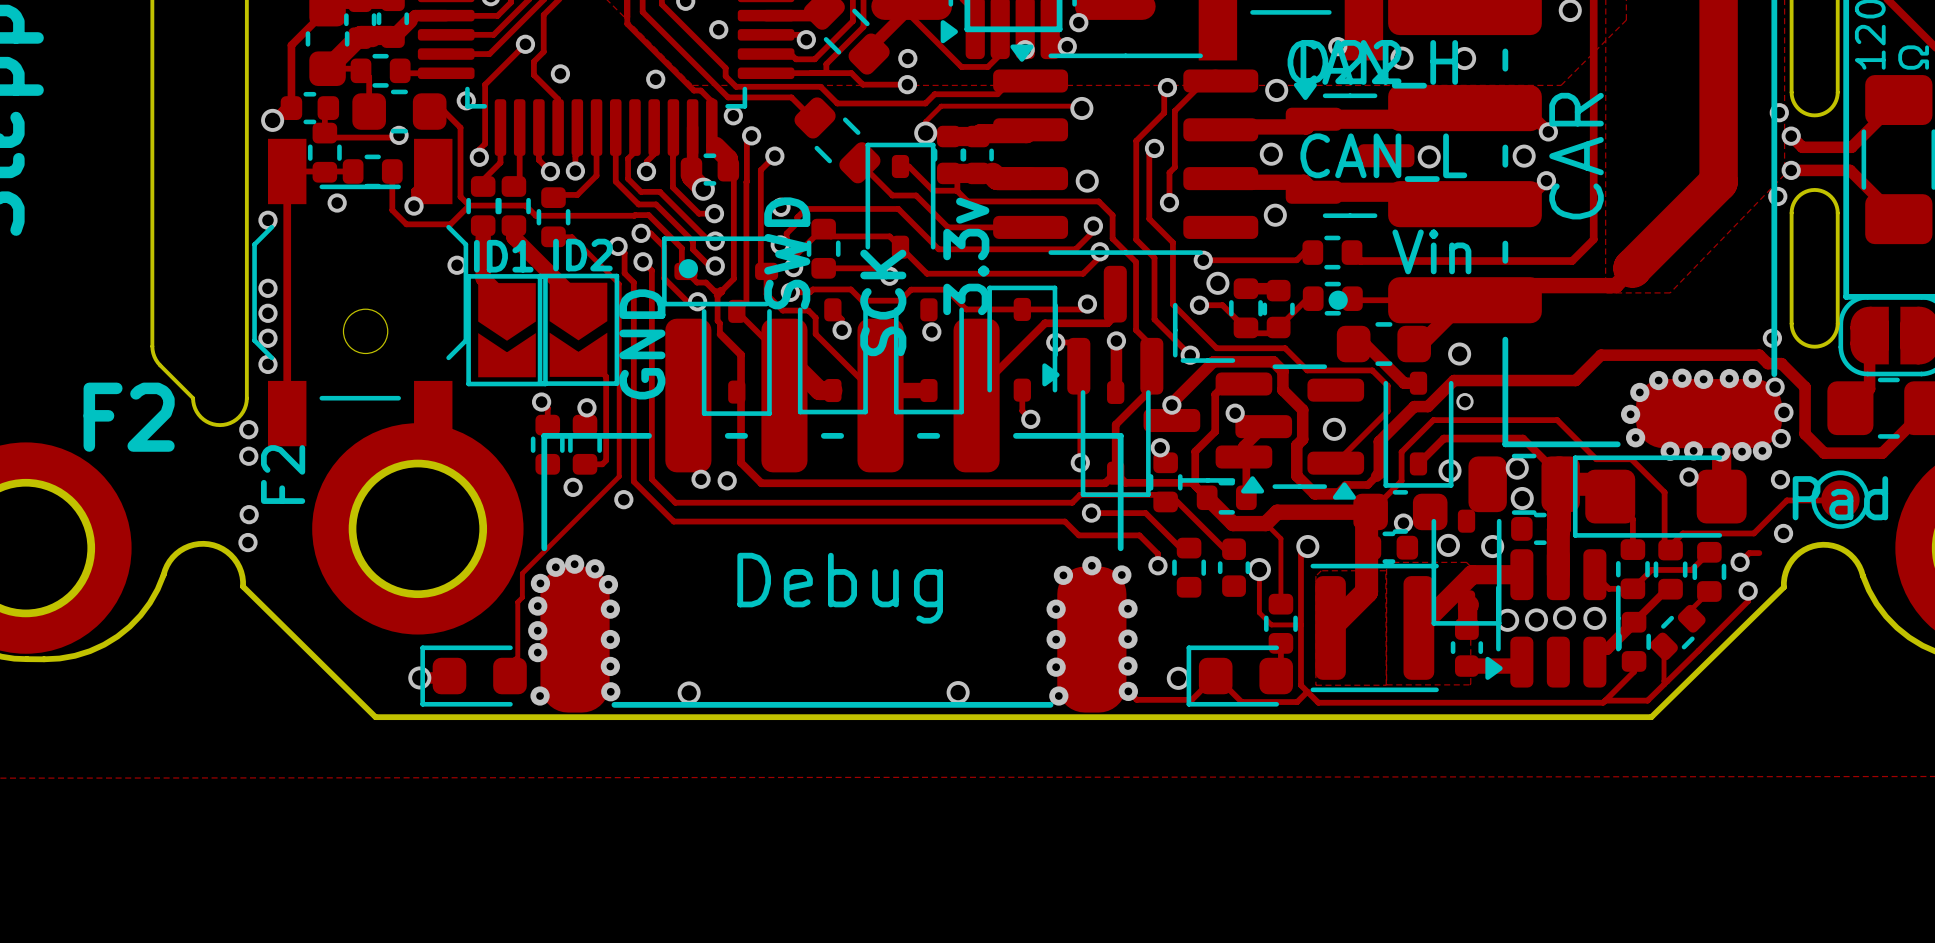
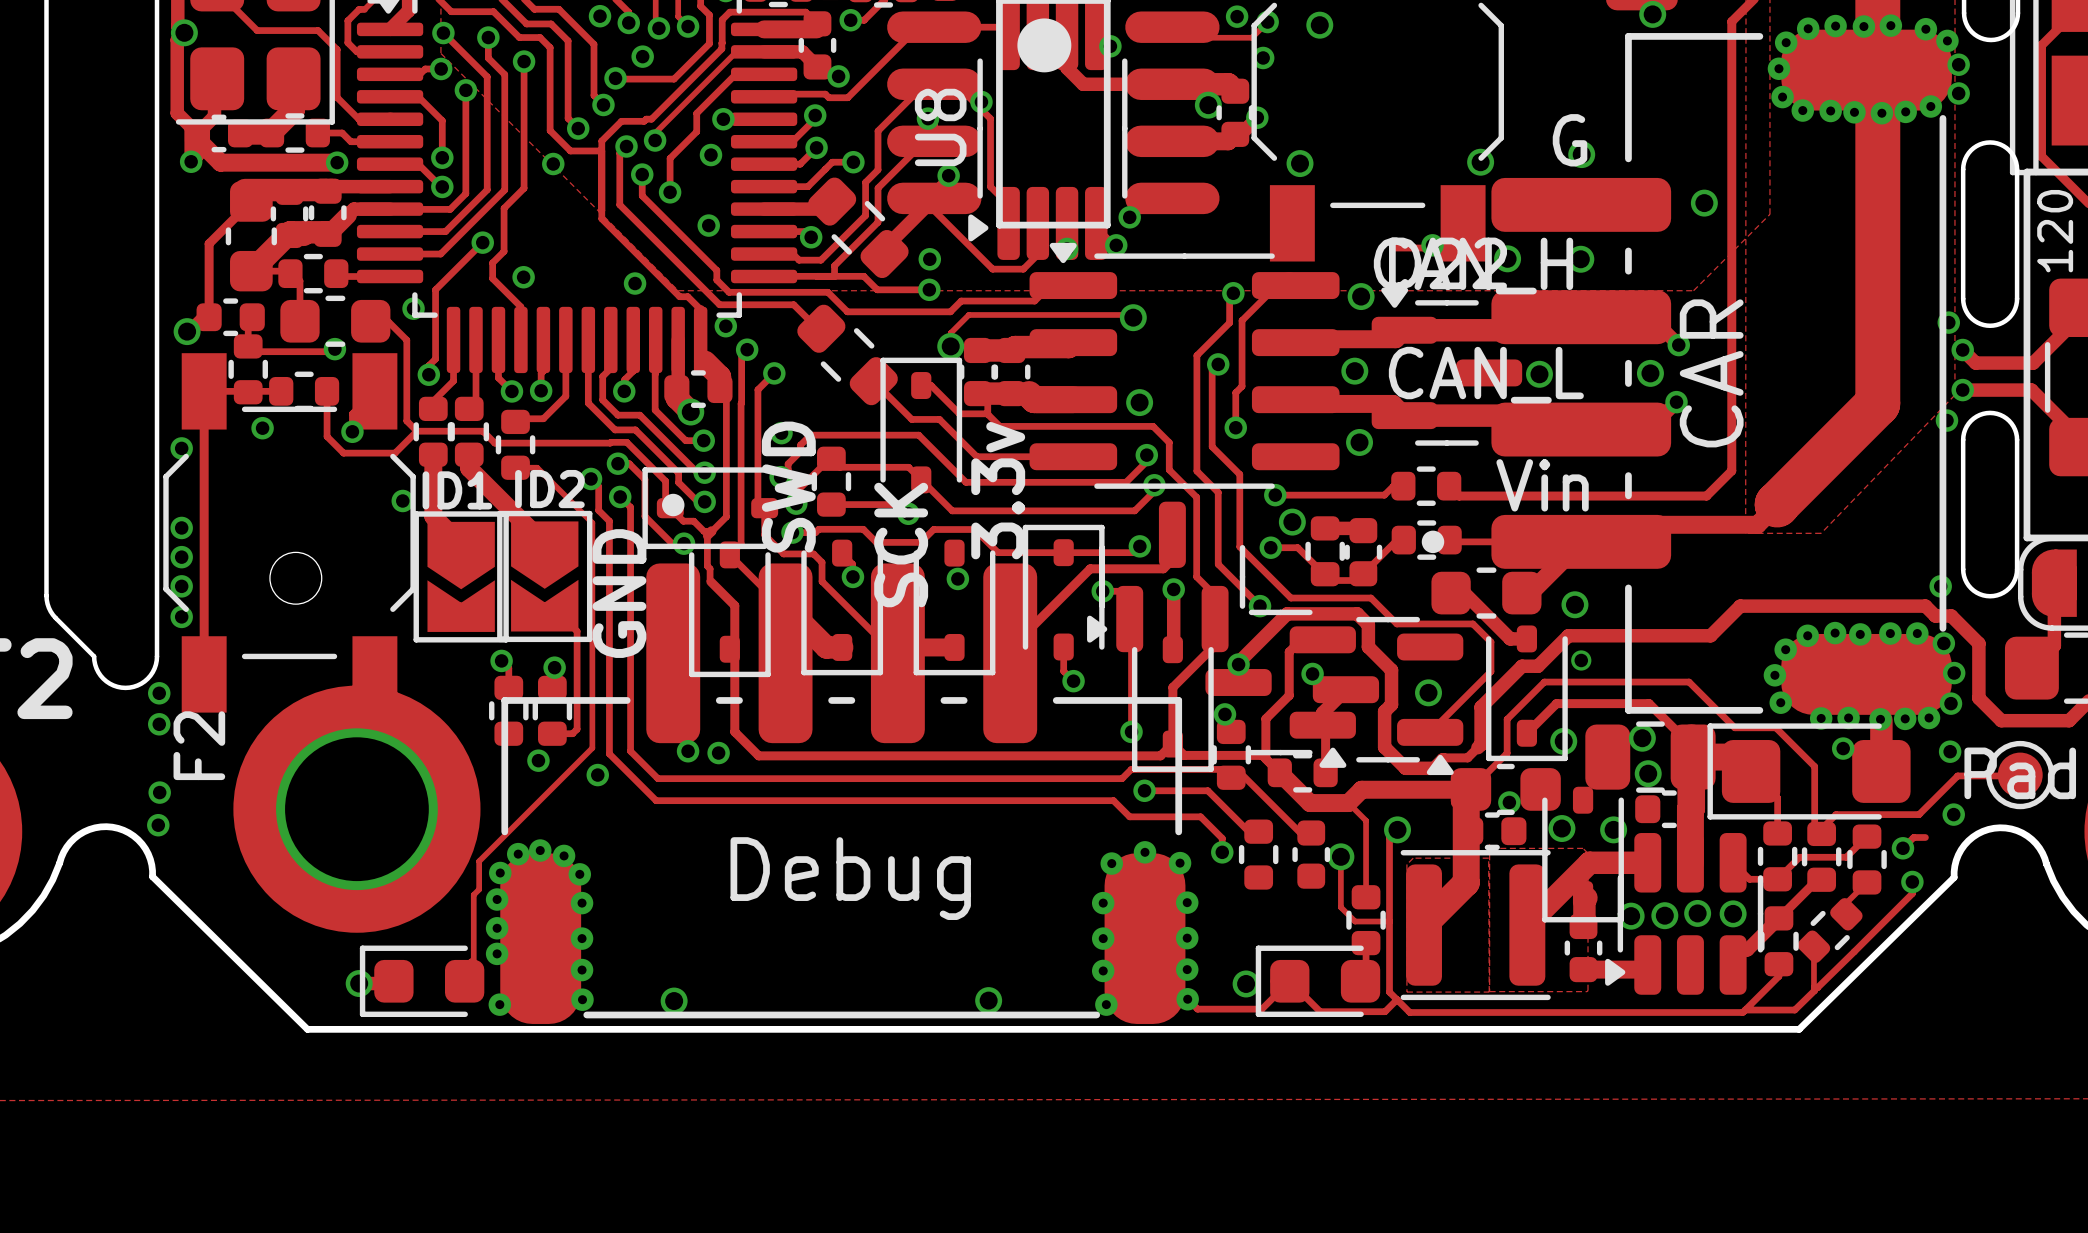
track: none -> (1425, 245) (1423, 248) (1394, 248)

